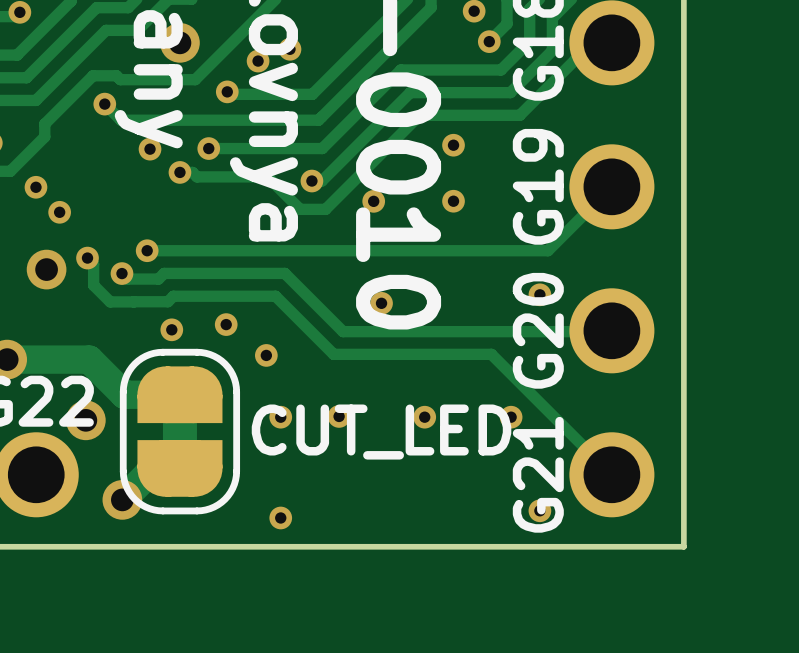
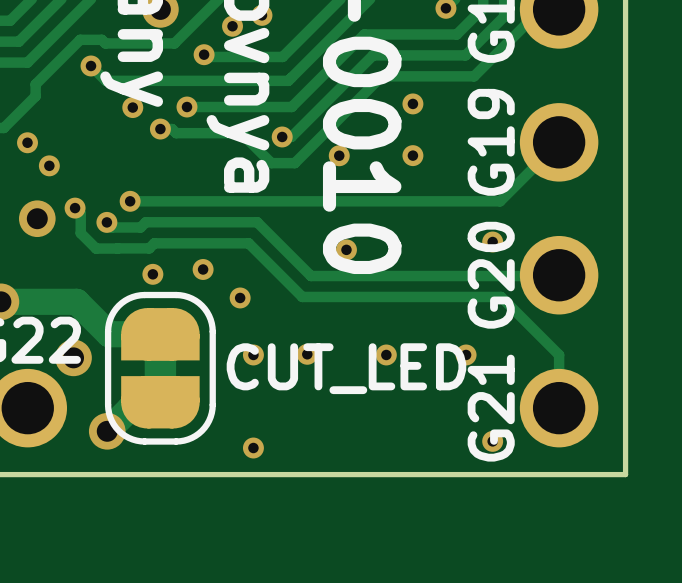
track: (491, 354) (611, 474) -> (447, 296) (501, 296) (559, 354) (559, 408)

